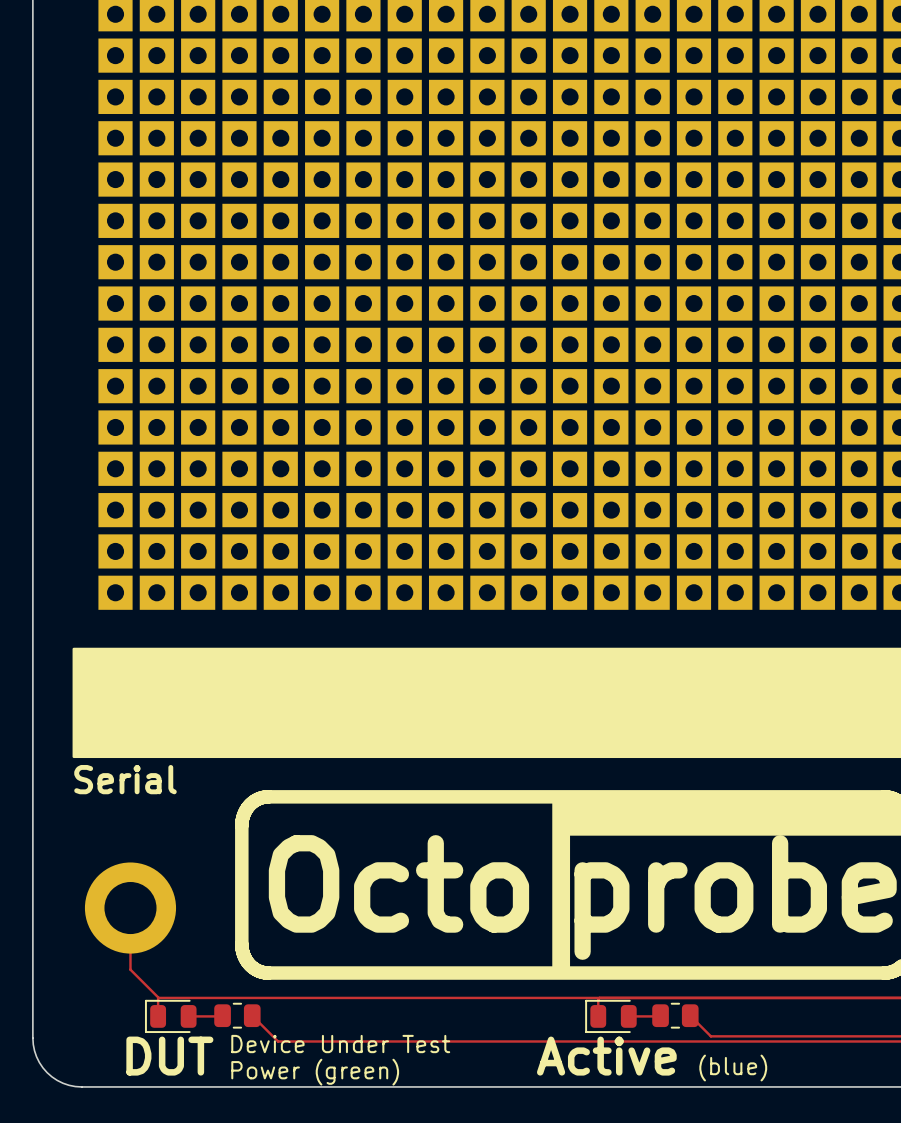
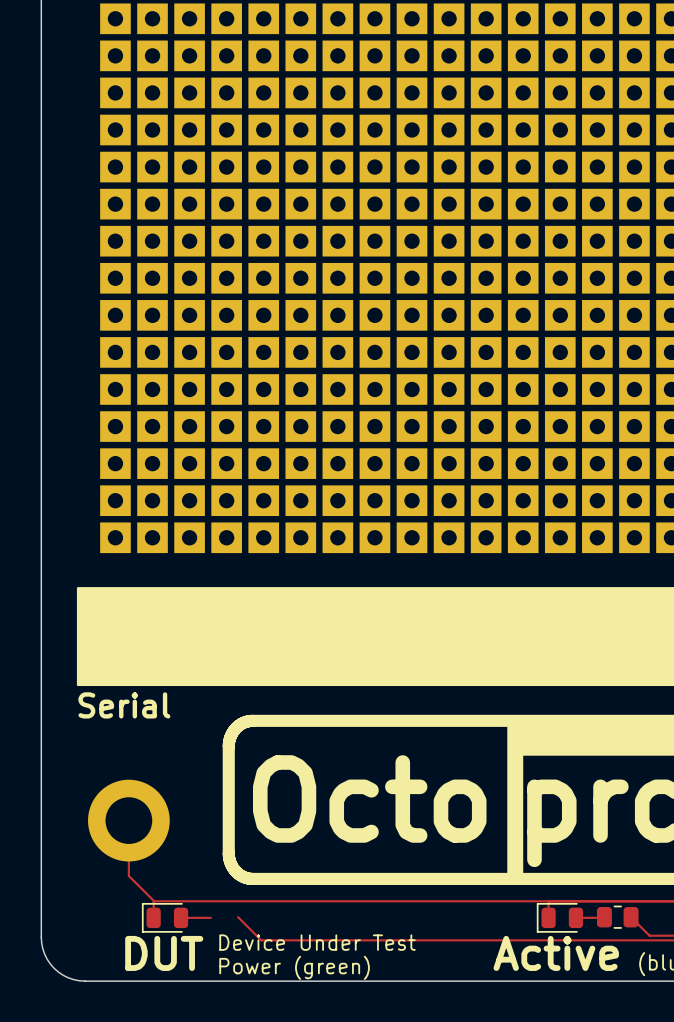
part: (237, 1015) -> none

